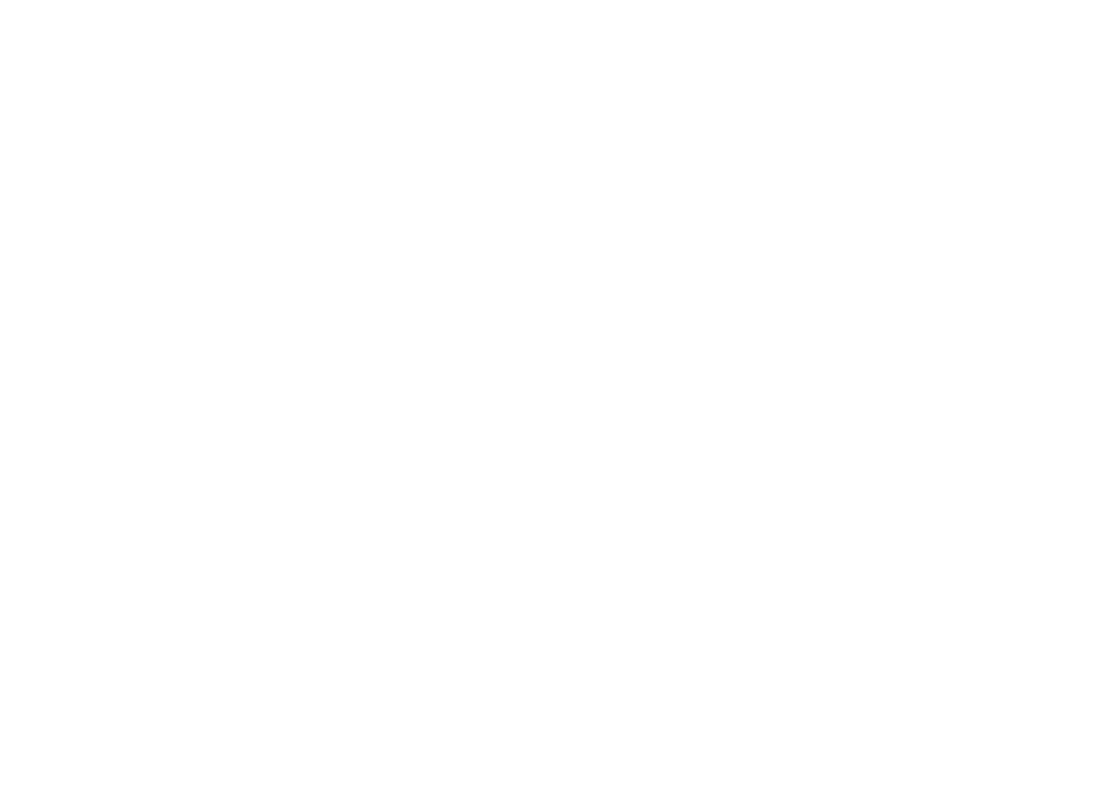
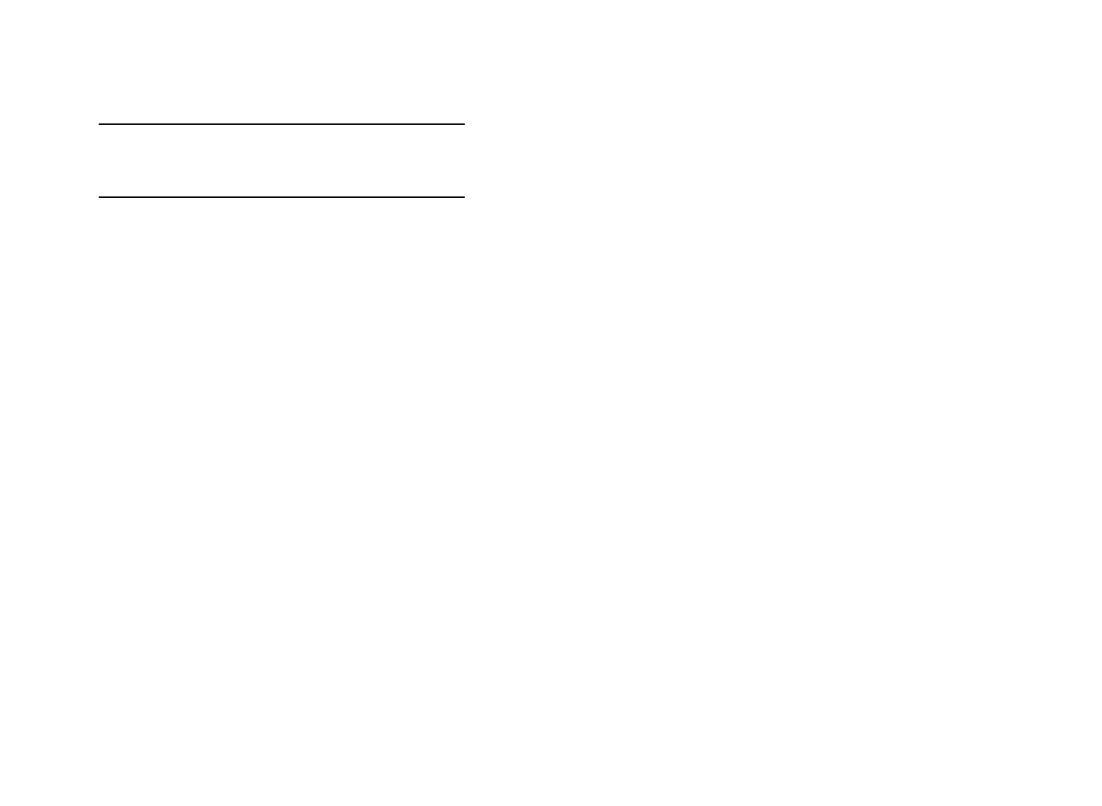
wire: none -> (99, 124) (464, 124)
wire: none -> (99, 197) (464, 197)

